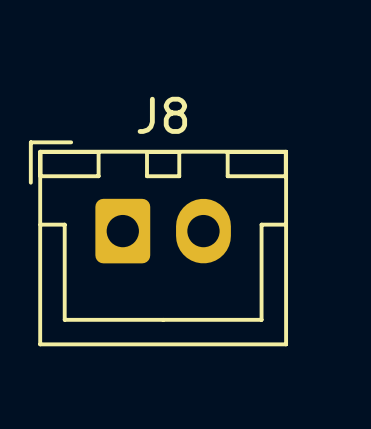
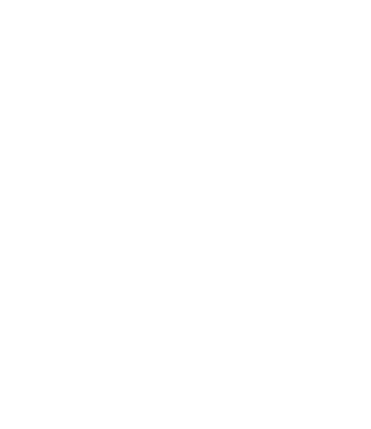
J8: (158, 243) -> none

